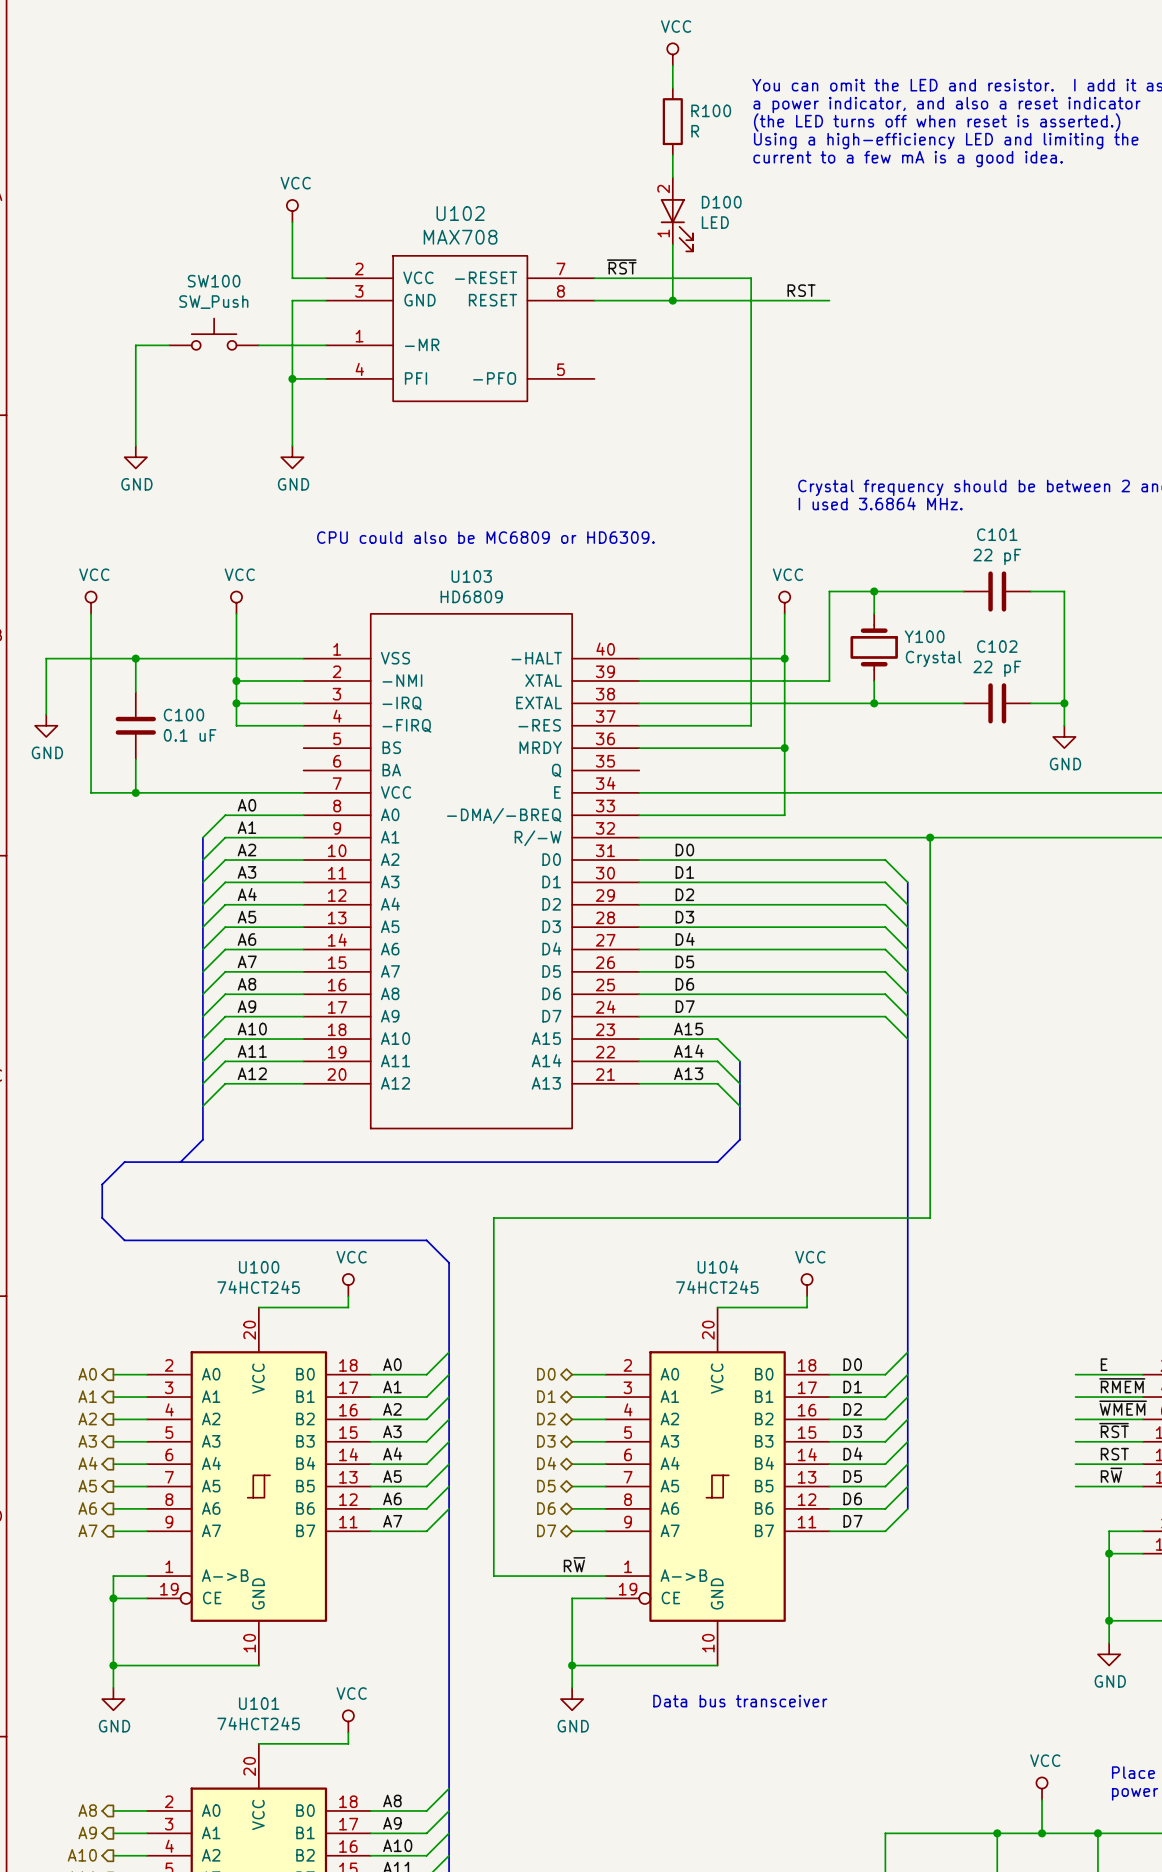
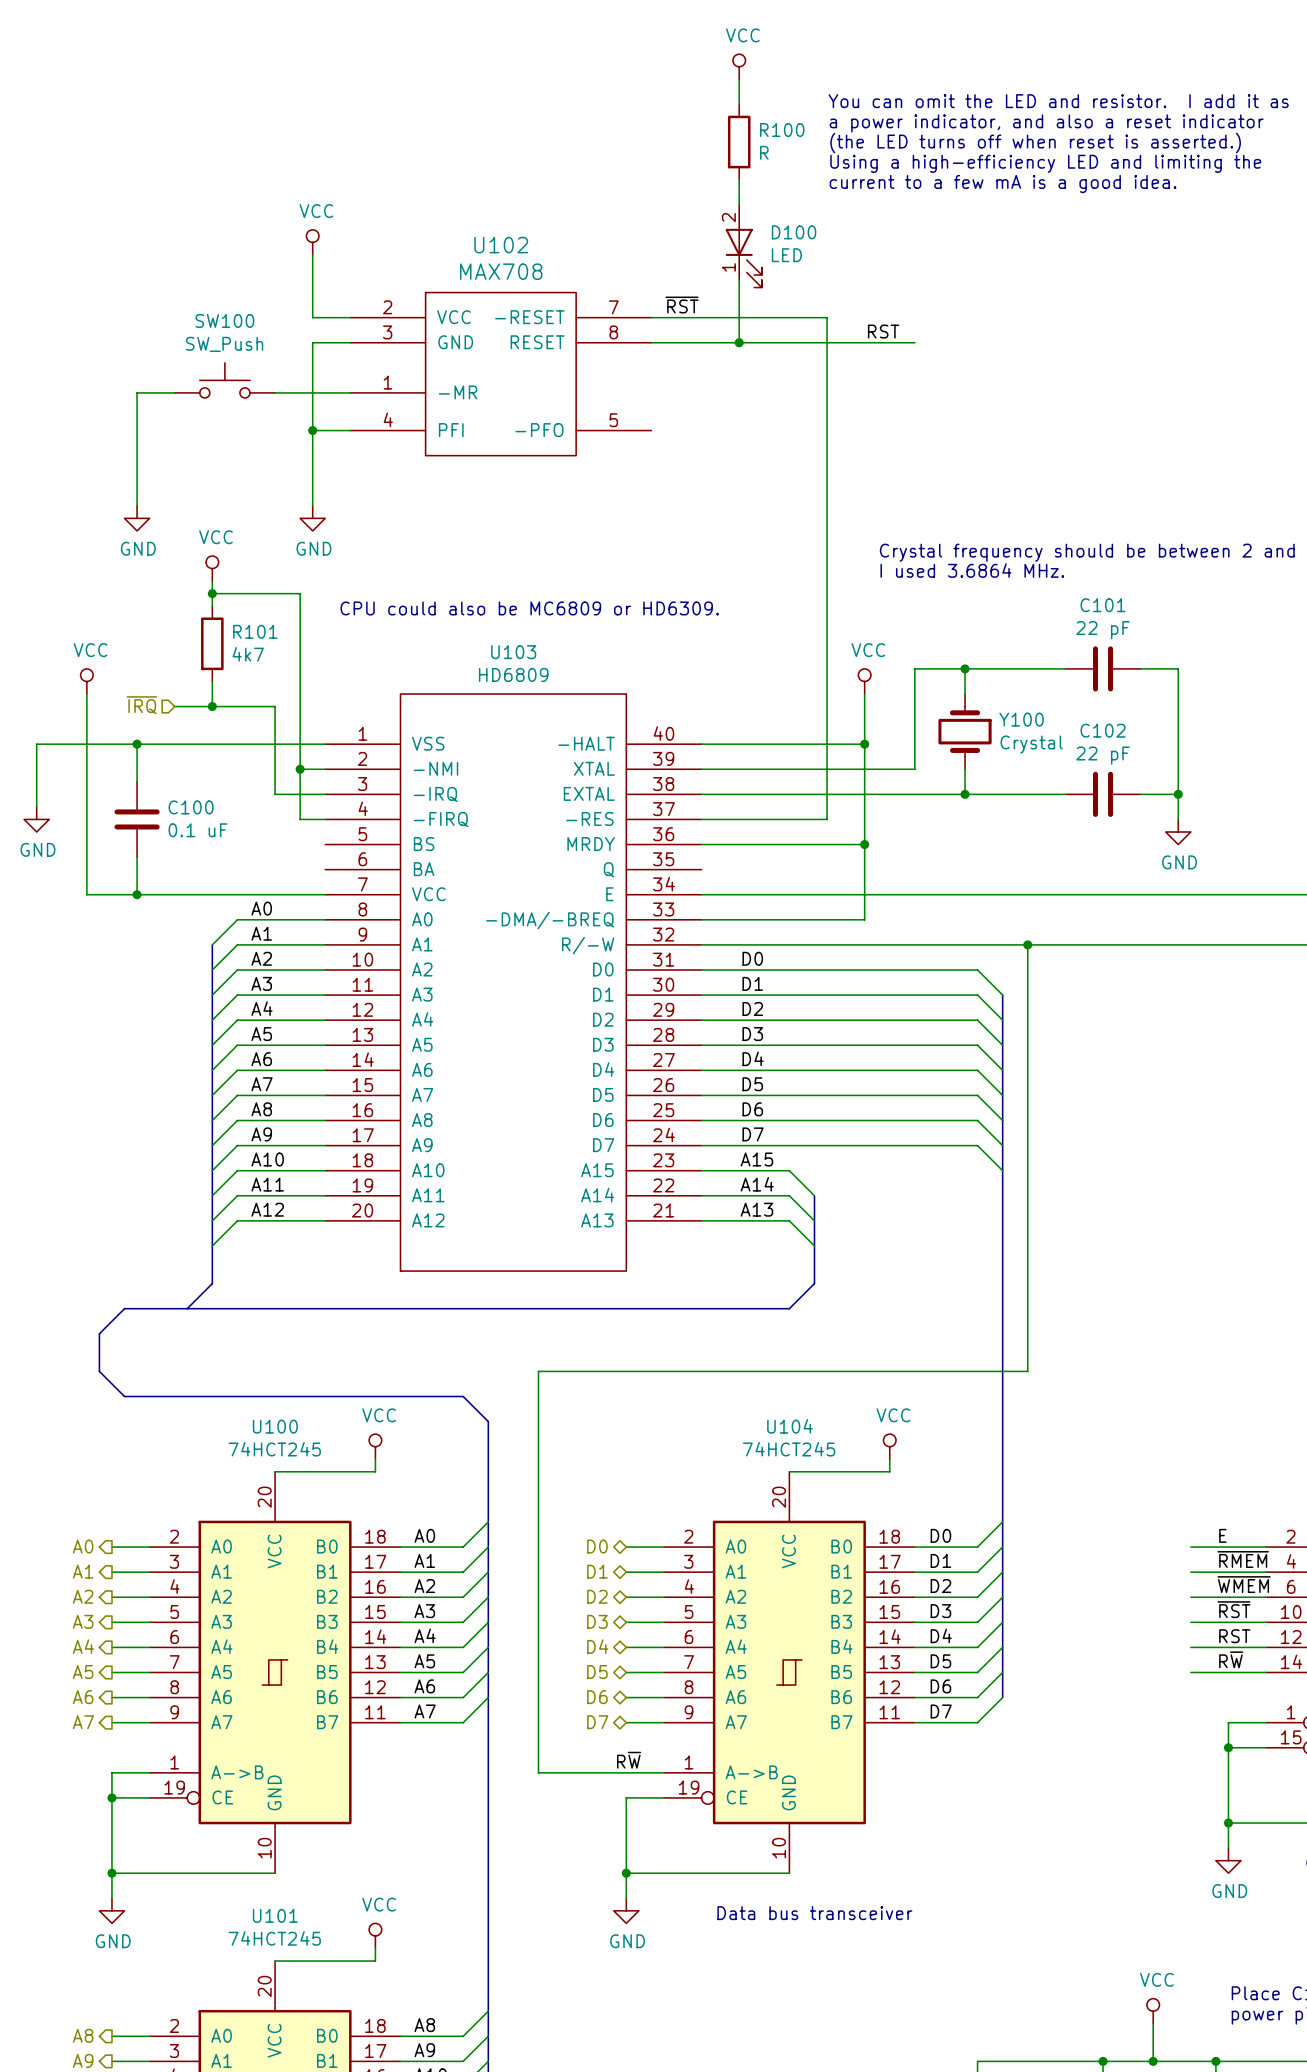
wire: none -> (212, 581) (212, 606)
junction: none -> (212, 593)
R101: none -> 4k7 (212, 643)
wire: none -> (212, 681) (212, 706)
power symbol position: VCC (236, 602) -> VCC (212, 568)
wire: (236, 613) (236, 725) (281, 725) -> (212, 593) (300, 593) (300, 819)
hierarchical label: none -> ~{IRQ} (141, 705)
junction: none -> (212, 706)
wire: (236, 681) (281, 681) -> none
junction: (236, 681) -> none
junction: none -> (300, 769)
wire: (236, 703) (258, 703) -> (174, 706) (275, 706) (275, 794)
junction: (236, 703) -> none

